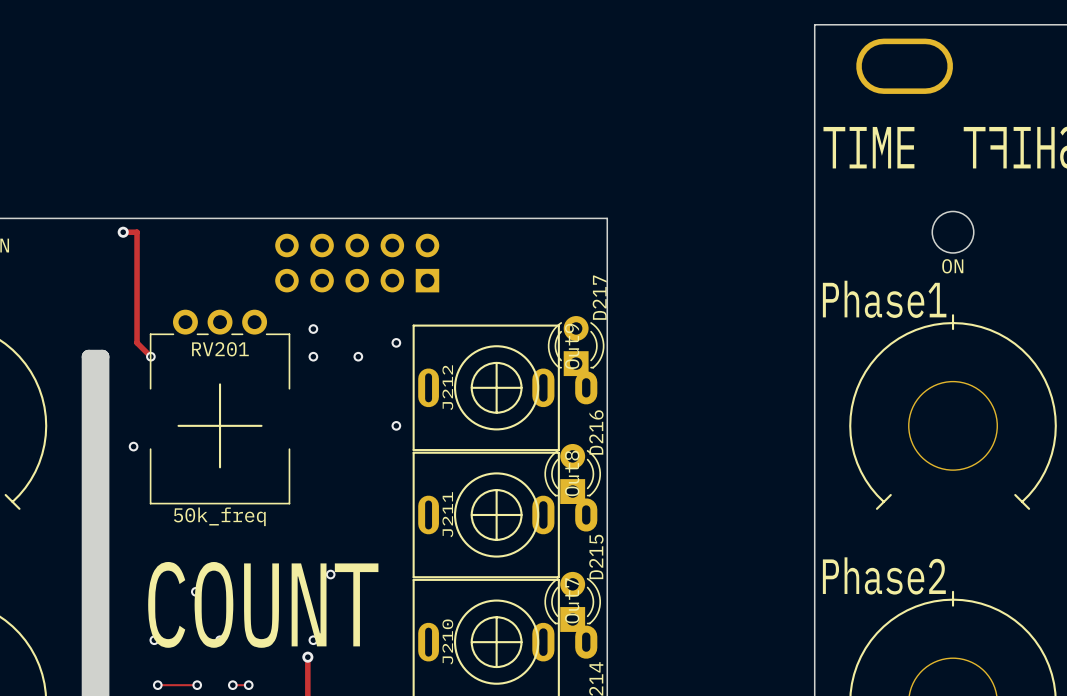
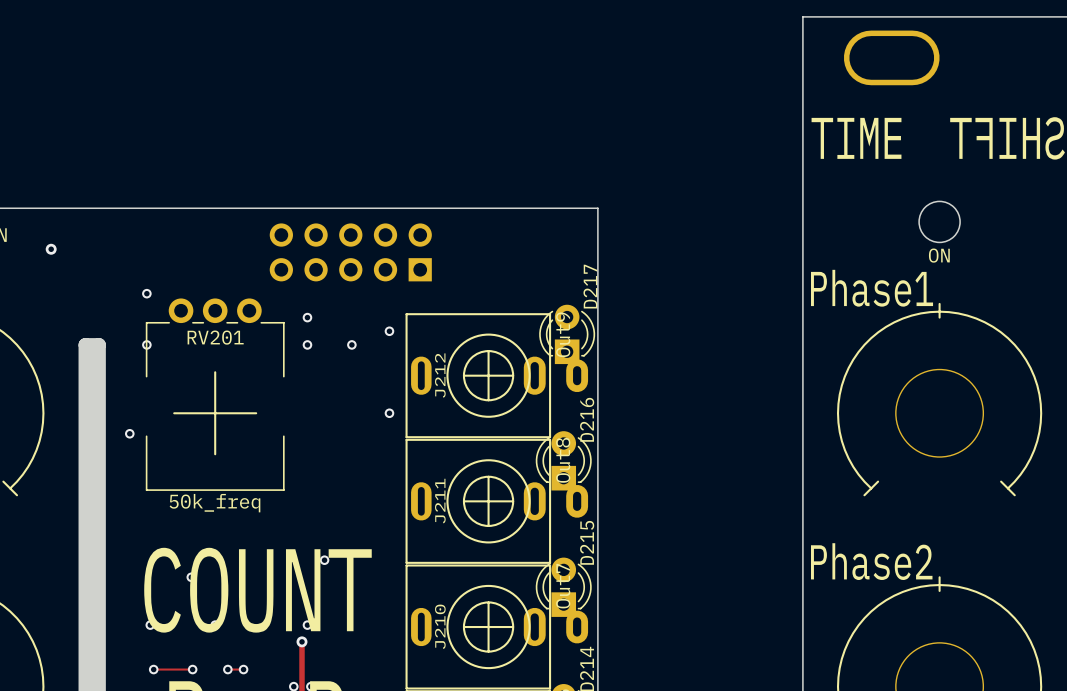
track: (123, 232) (137, 232) (137, 342) (150, 356) -> none
via position: (123, 232) -> (51, 249)
via: none -> (146, 293)

